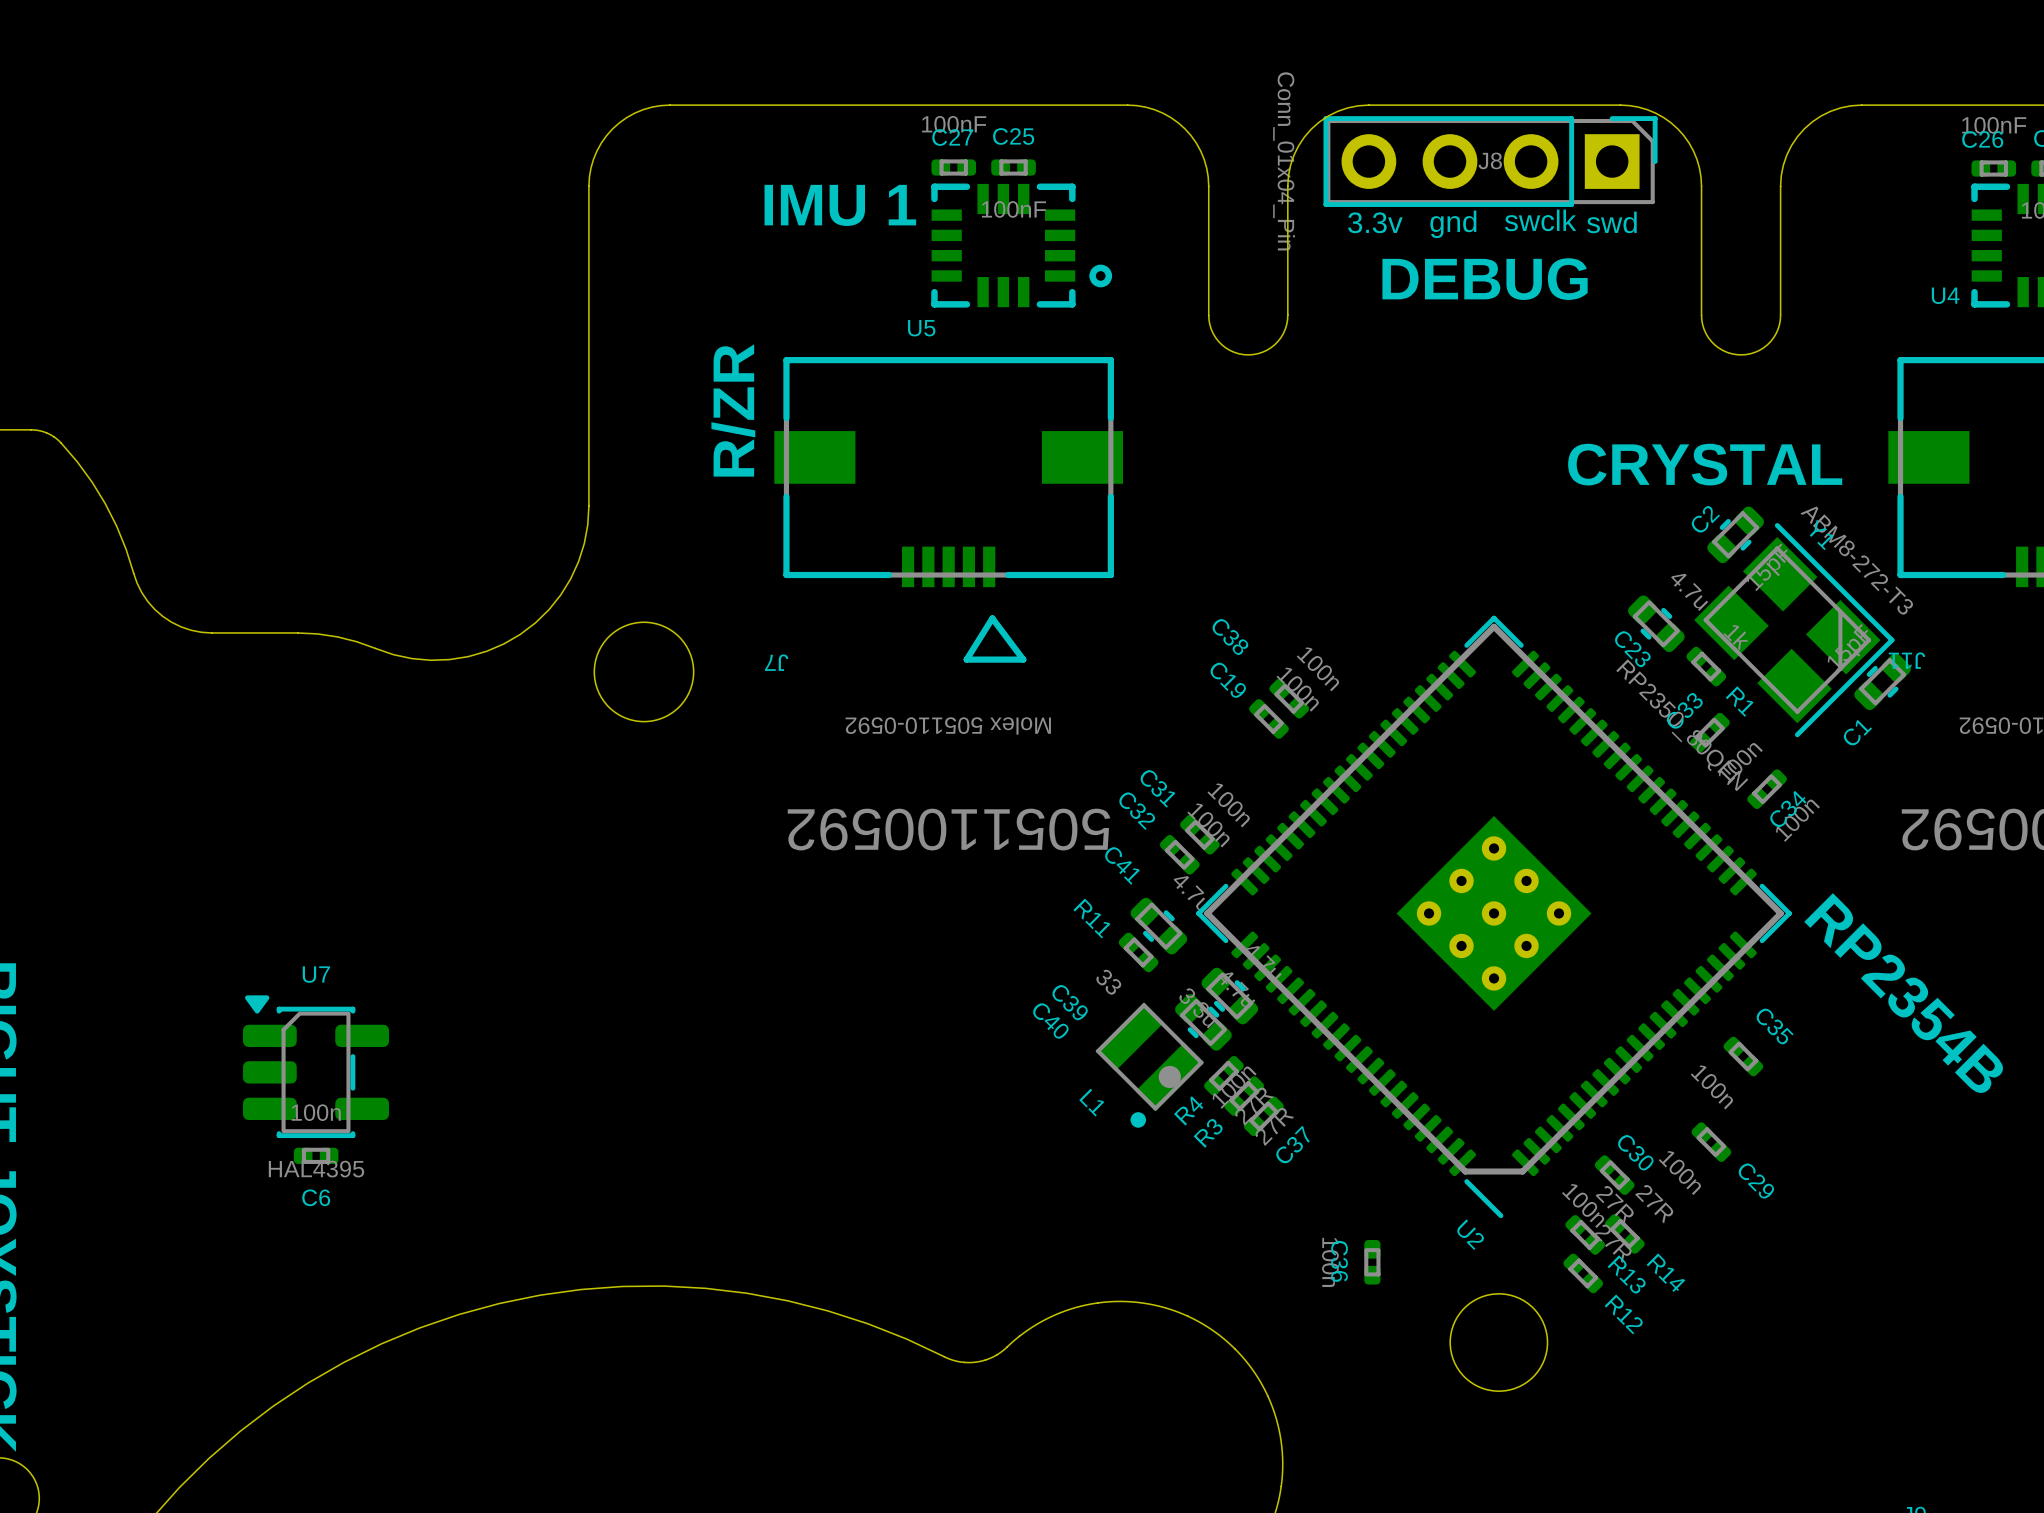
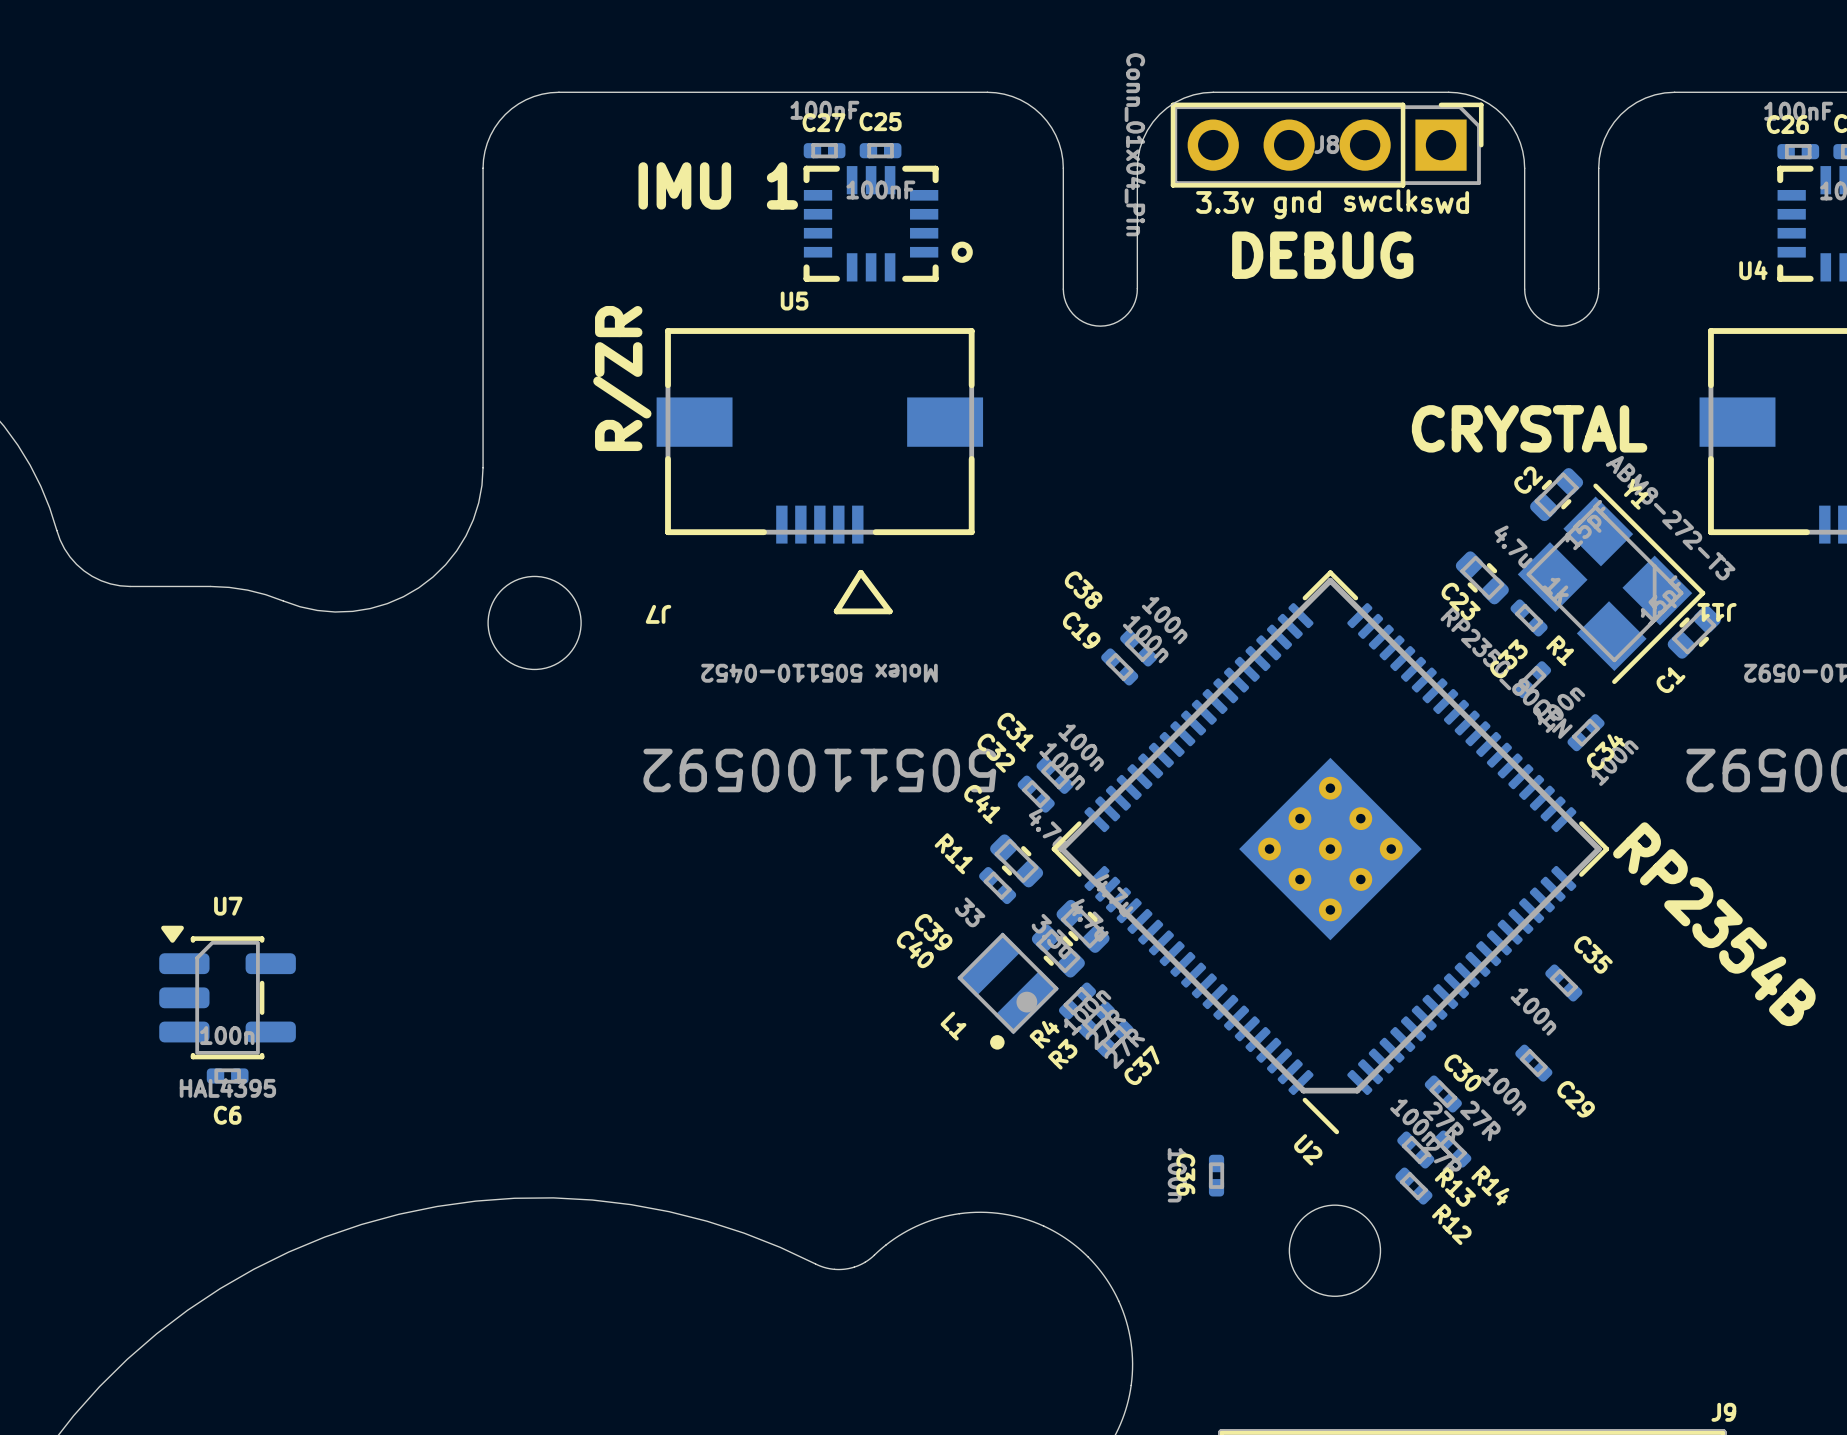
J7 value: Molex 505110-0592 (948, 725) -> Molex 505110-0452 (819, 673)

